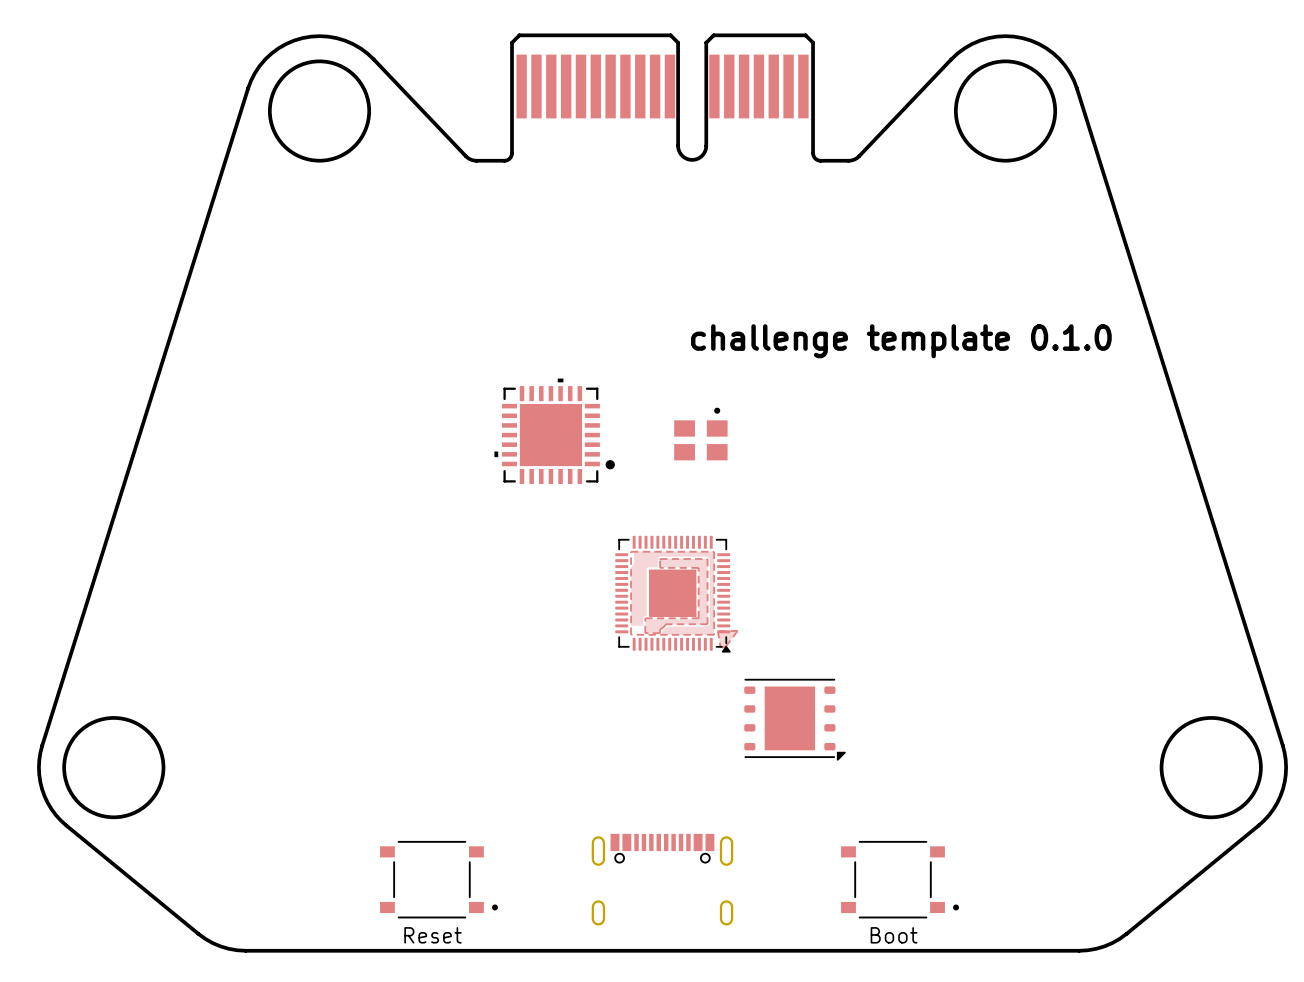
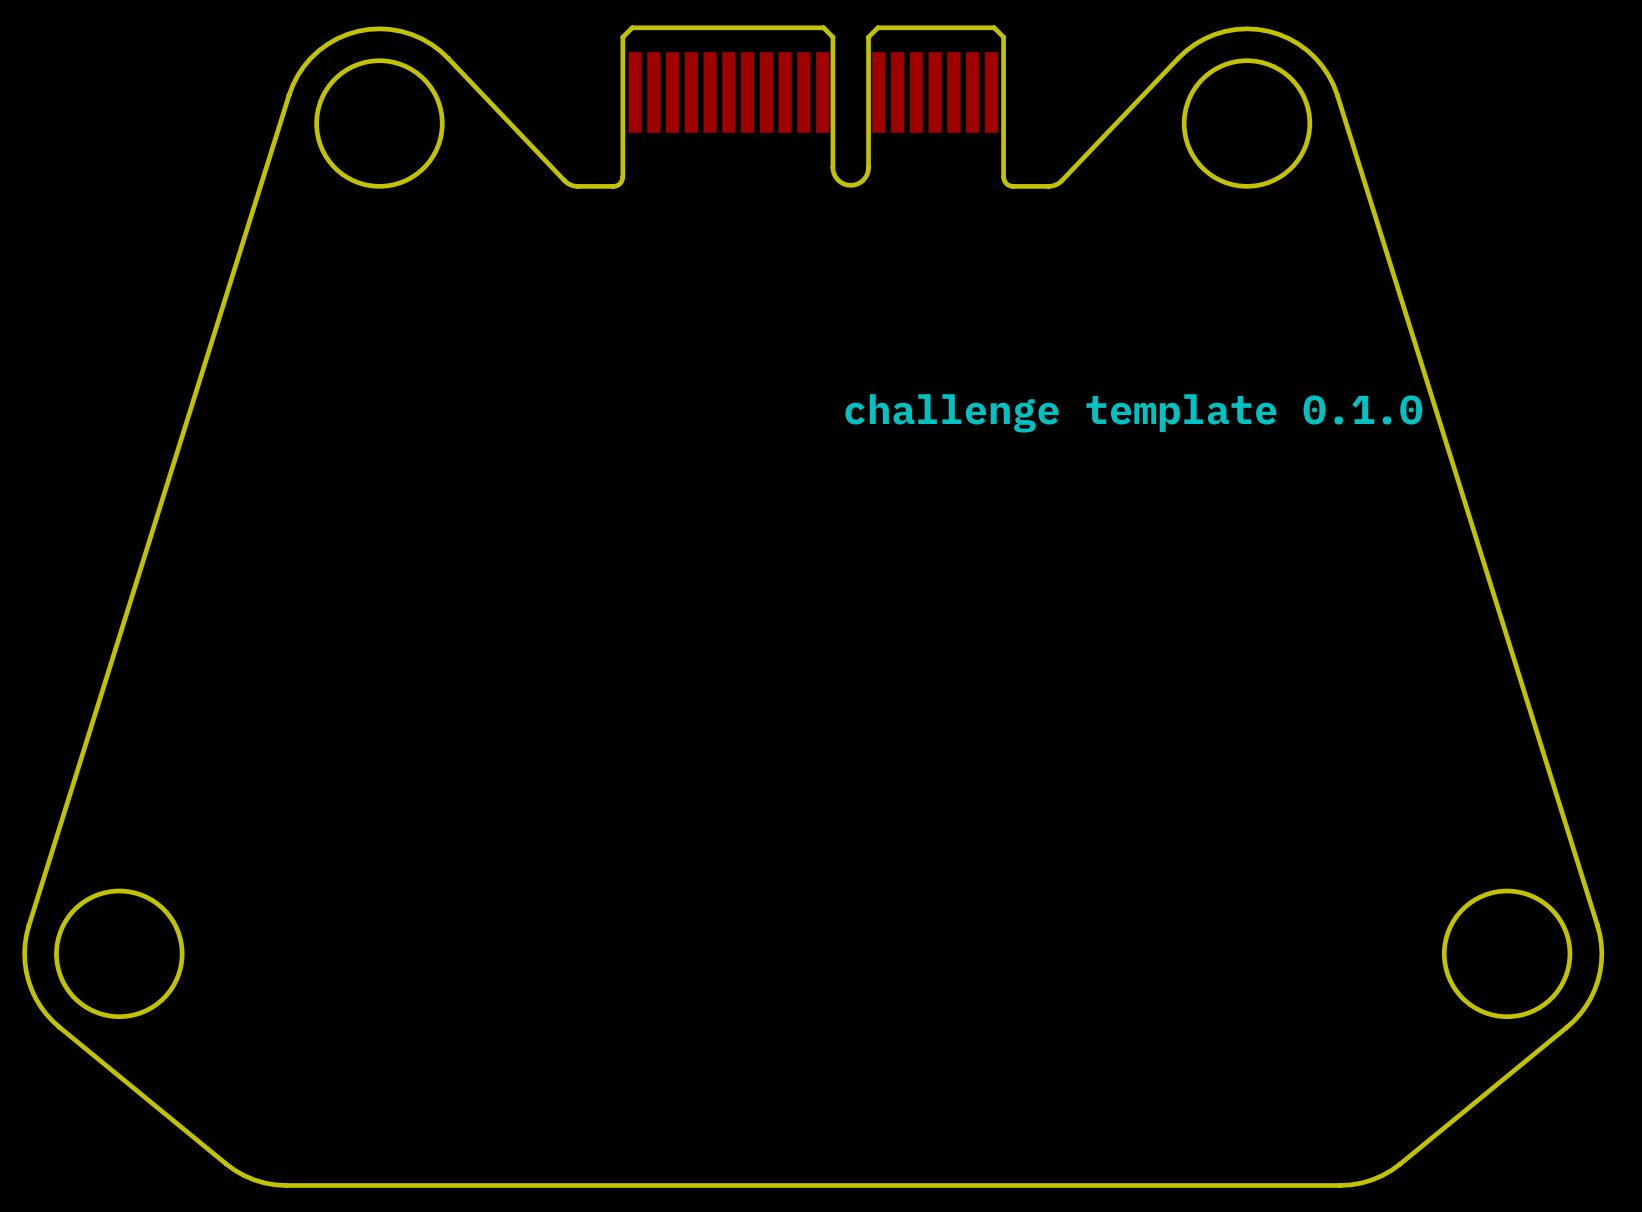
part: (554, 431) -> none
part: (700, 434) -> none
zone outline: (631, 551) (714, 551) (714, 634) (631, 634) (631, 551) -> none
zone outline: (660, 558) (660, 567) (698, 567) (698, 618) (645, 618) (645, 633) (660, 633) (660, 629) (666, 624) (707, 624) (707, 558) (660, 558) -> none
part: (672, 594) -> none
zone outline: (737, 630) (725, 646) (720, 646) (717, 631) (737, 630) -> none
part: (795, 719) -> none
part: (438, 879) -> none
part: (662, 879) -> none
part: (900, 879) -> none
text: Reset (433, 935) -> none
text: Boot (894, 935) -> none

